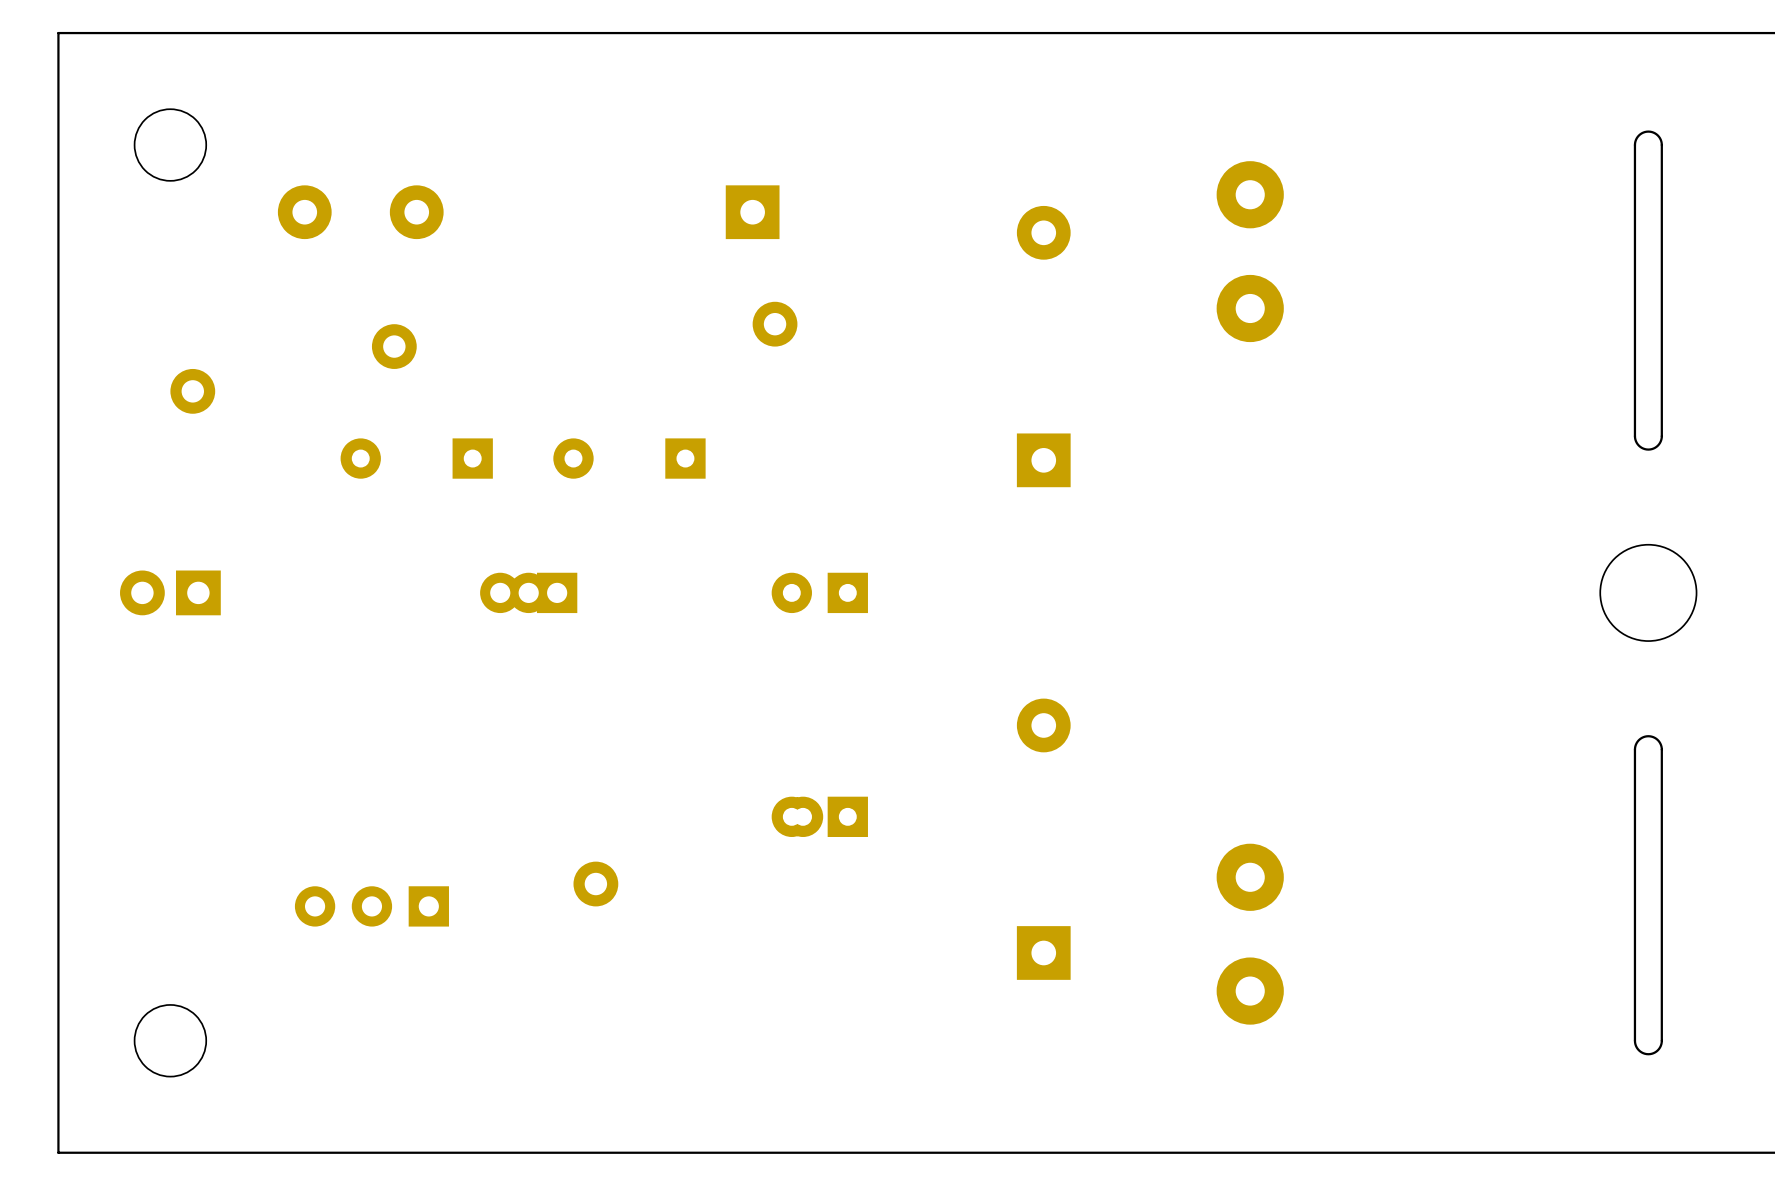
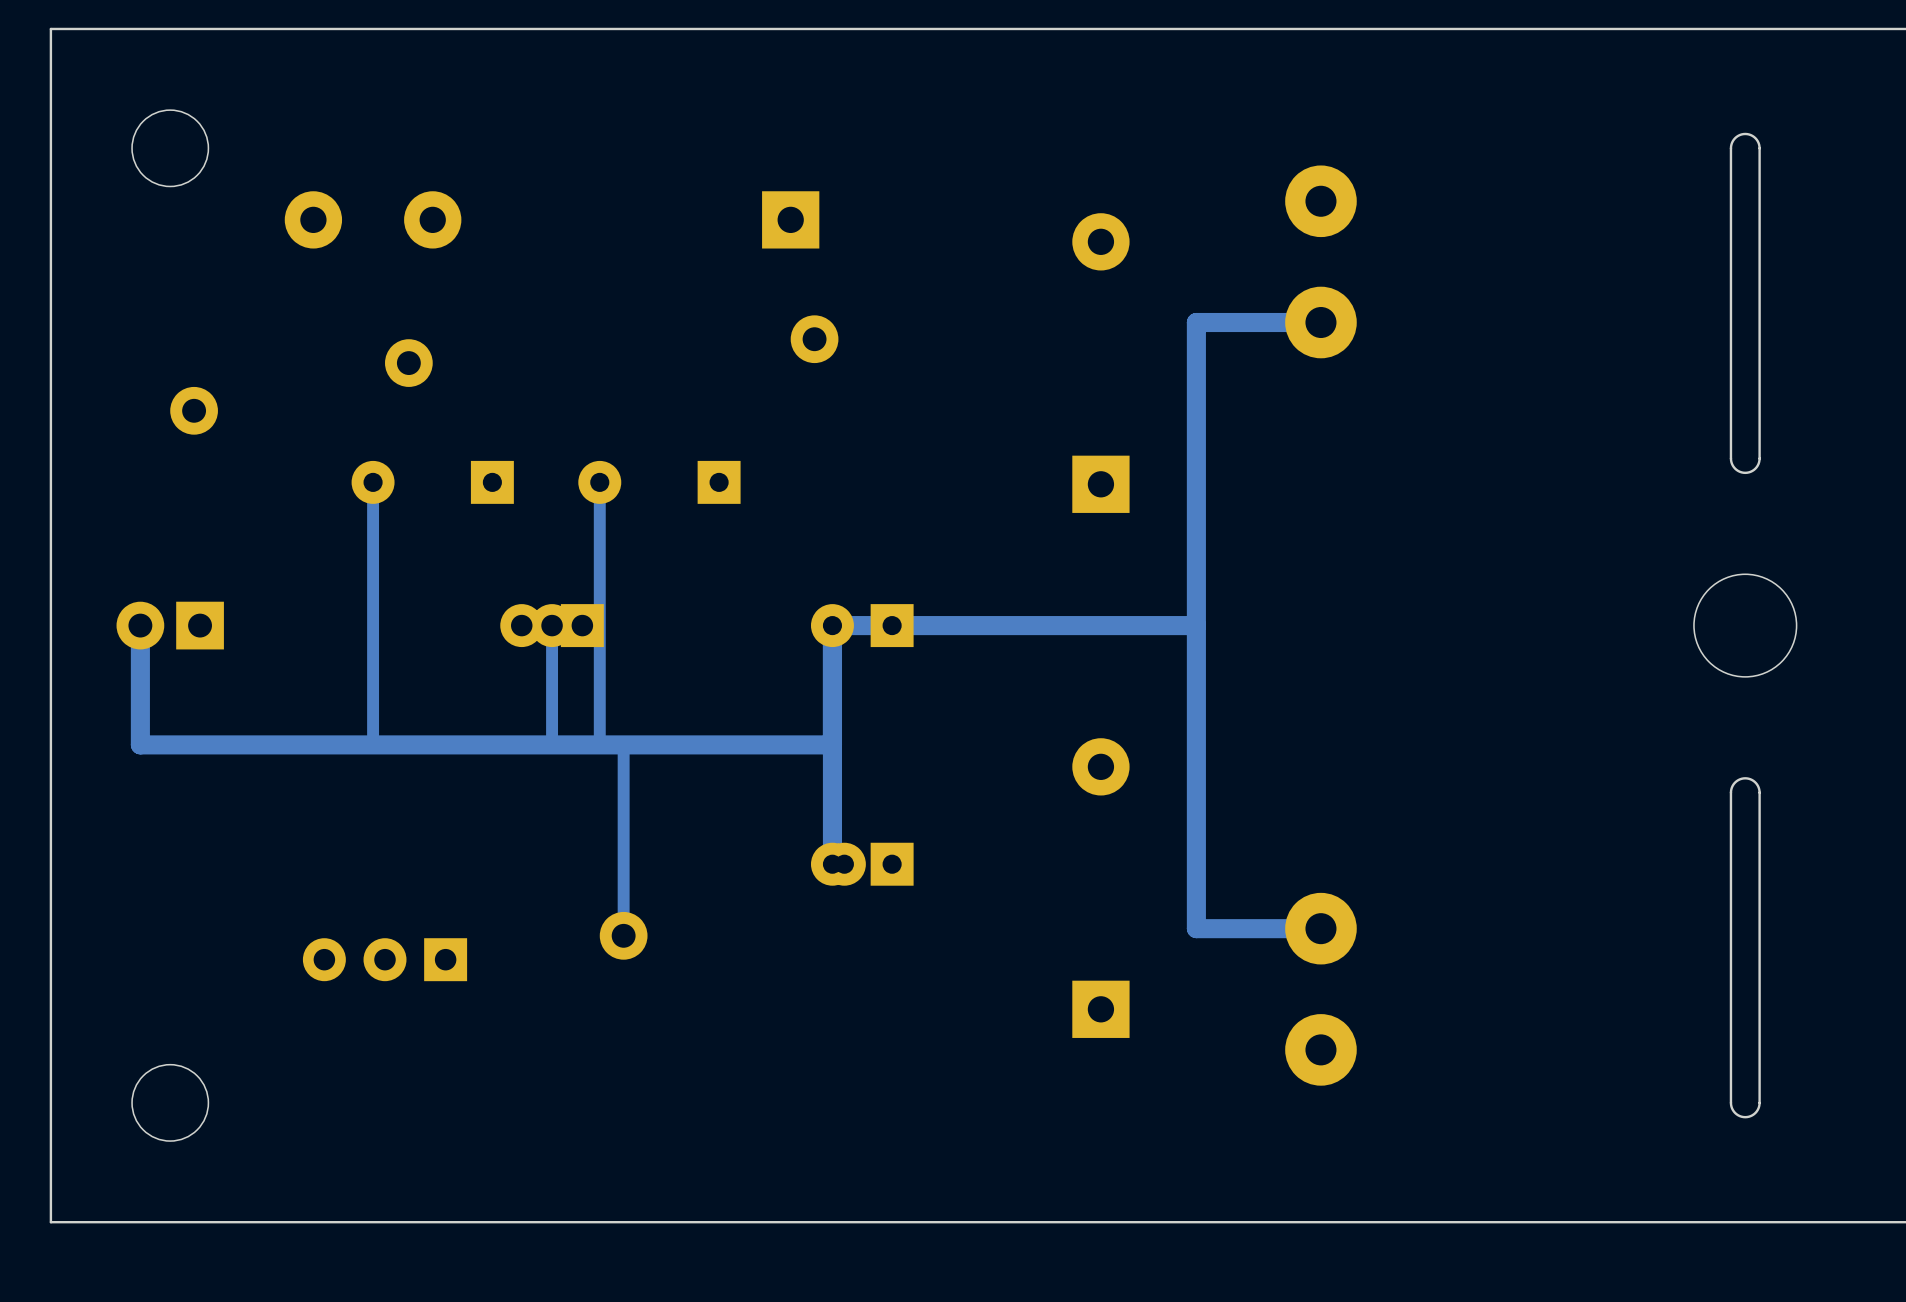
track: none -> (1320, 322) (1196, 322) (1196, 928) (1320, 928)
track: none -> (373, 482) (373, 744)
track: none -> (599, 482) (599, 744)
track: none -> (140, 625) (140, 744) (832, 744)
track: none -> (552, 625) (552, 744)
track: none -> (1196, 625) (832, 625) (832, 864) (844, 864)
track: none -> (623, 744) (623, 935)

